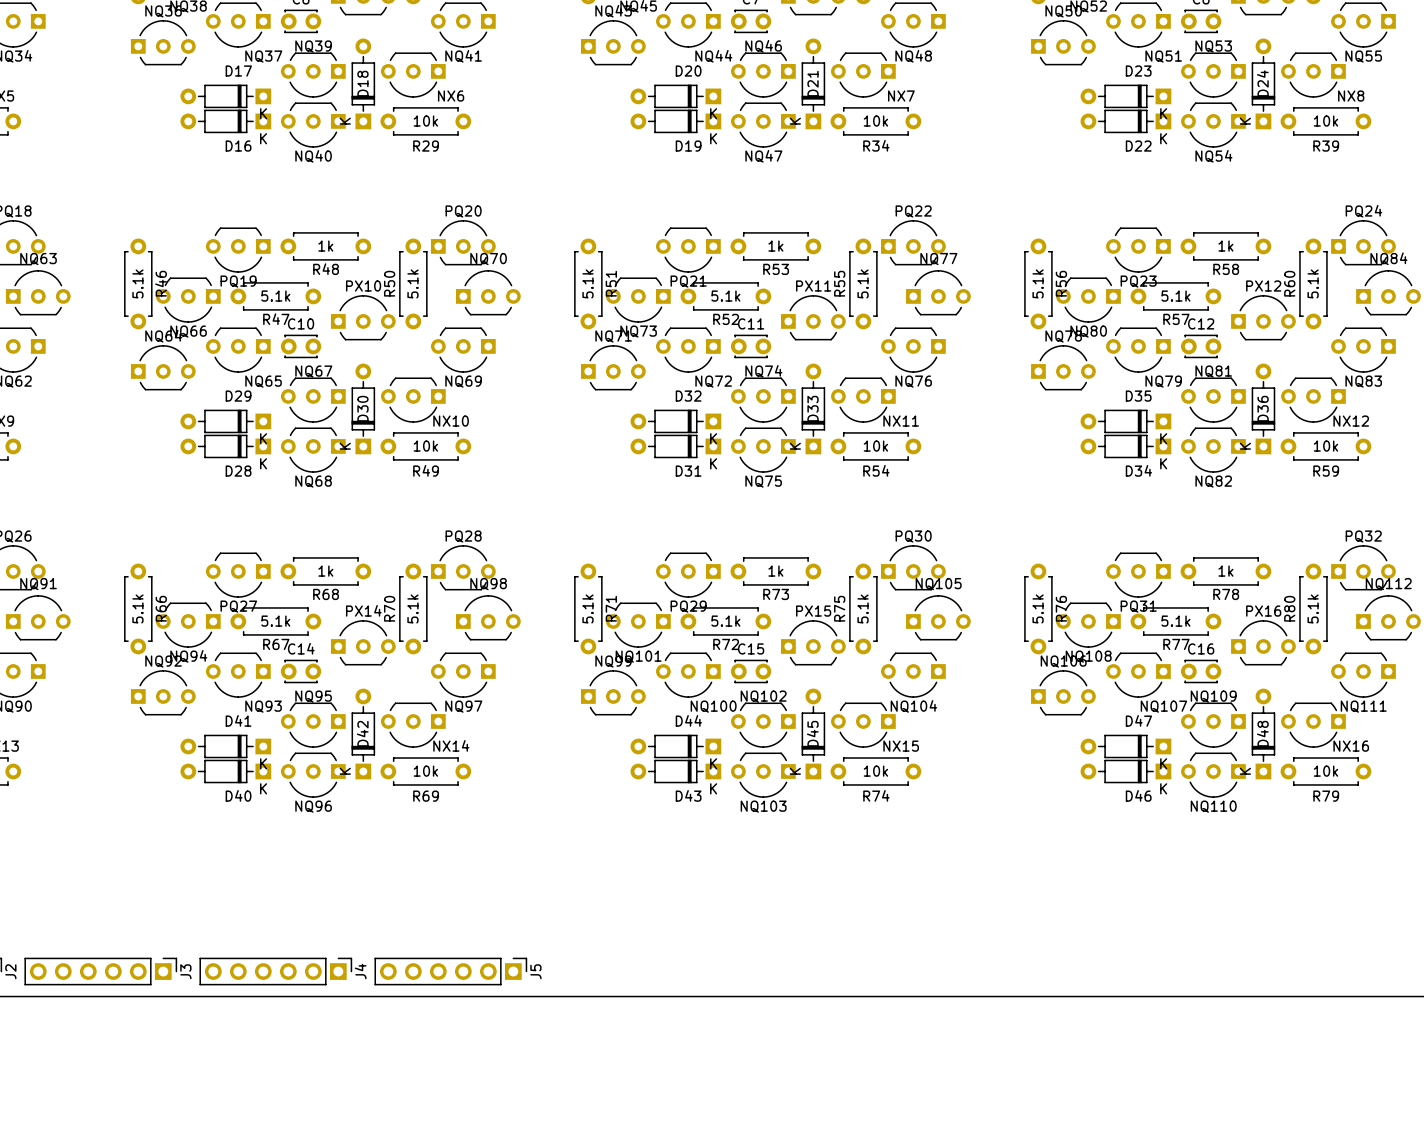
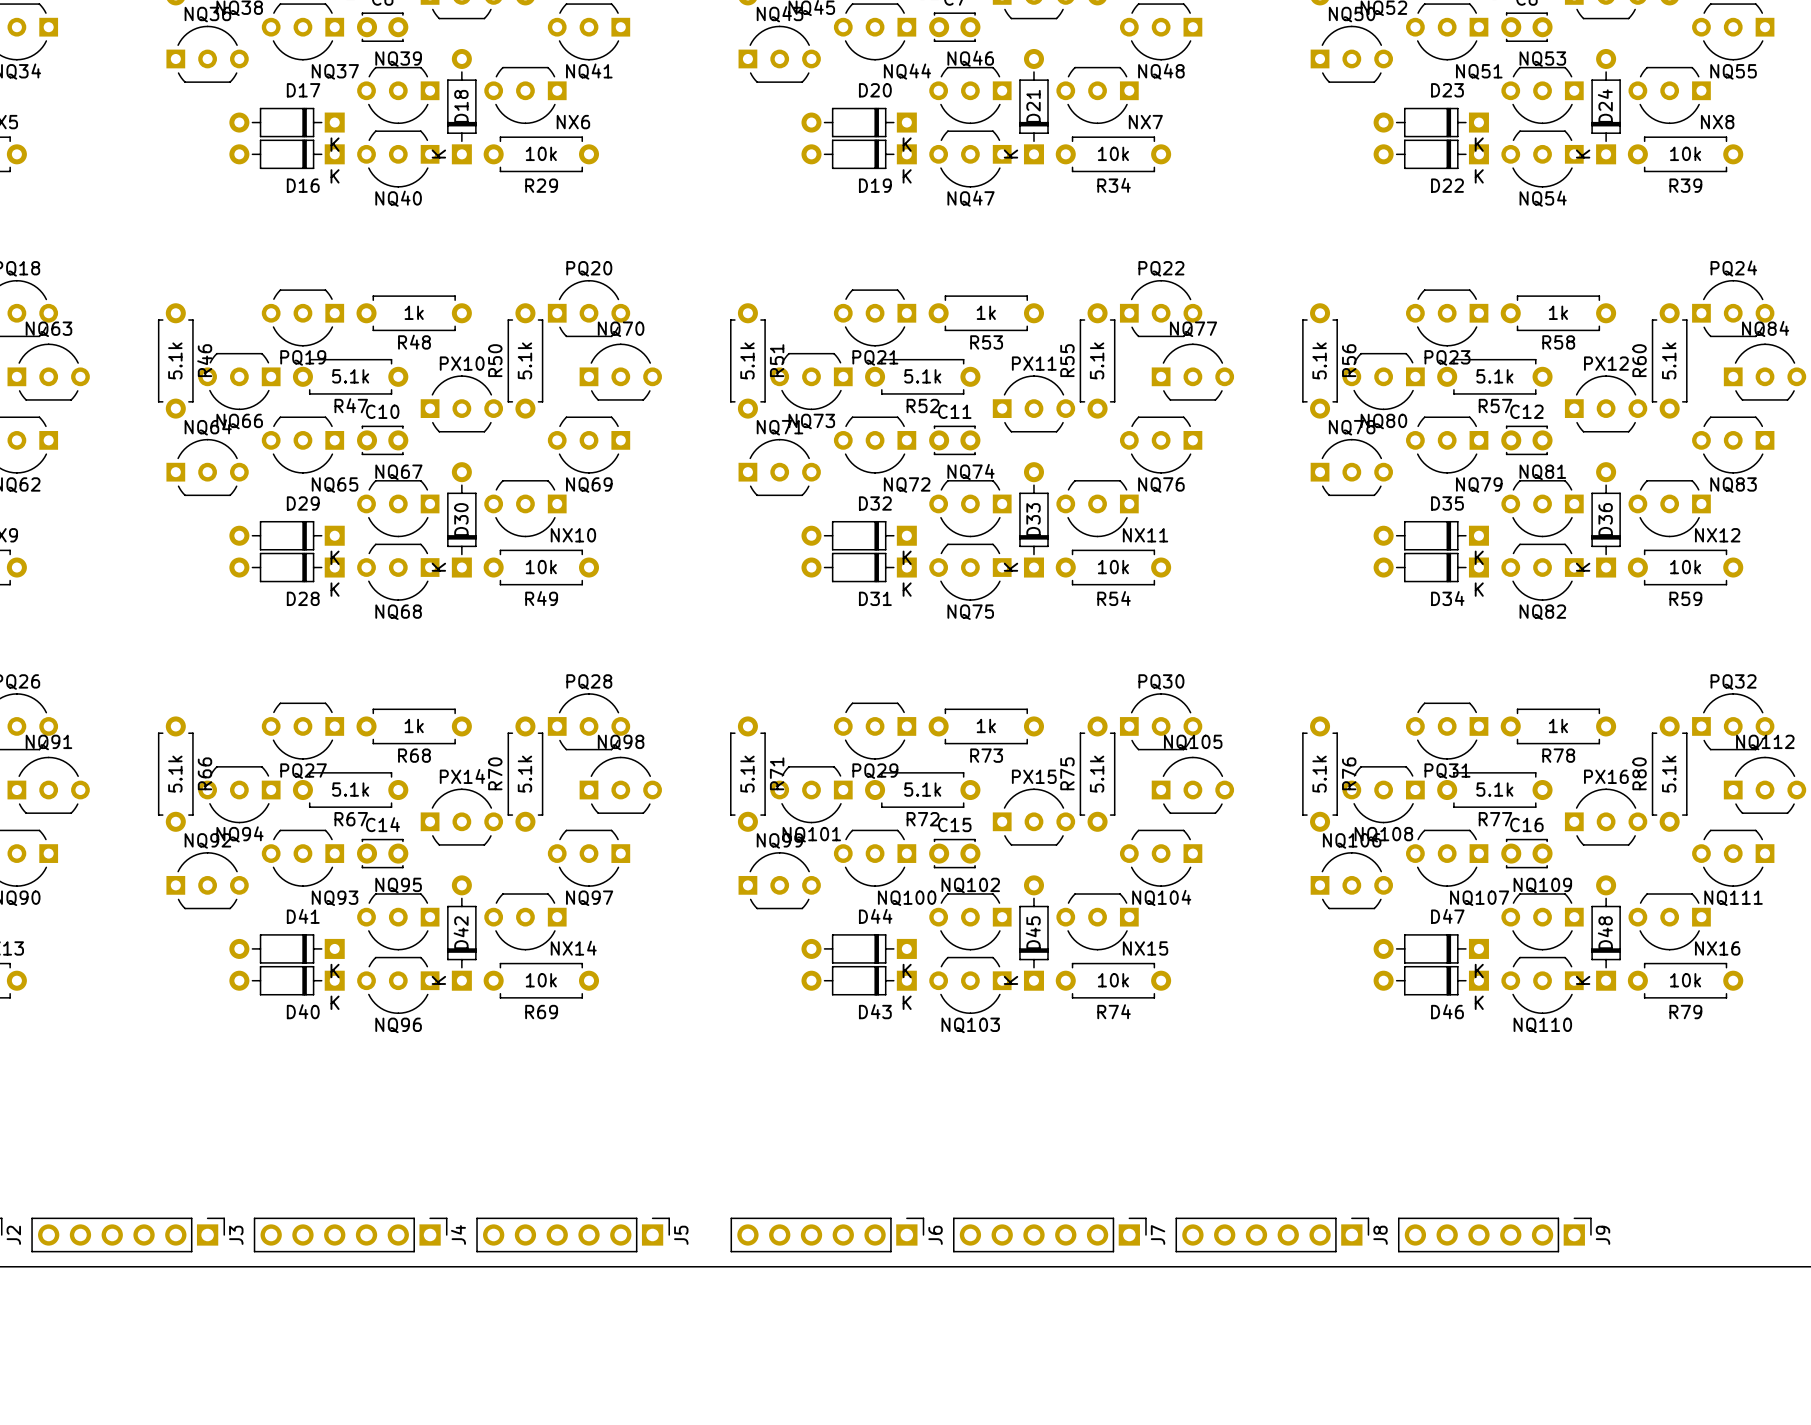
J6: none -> (827, 1234)
J7: none -> (1049, 1234)
J8: none -> (1272, 1234)
J9: none -> (1494, 1234)

